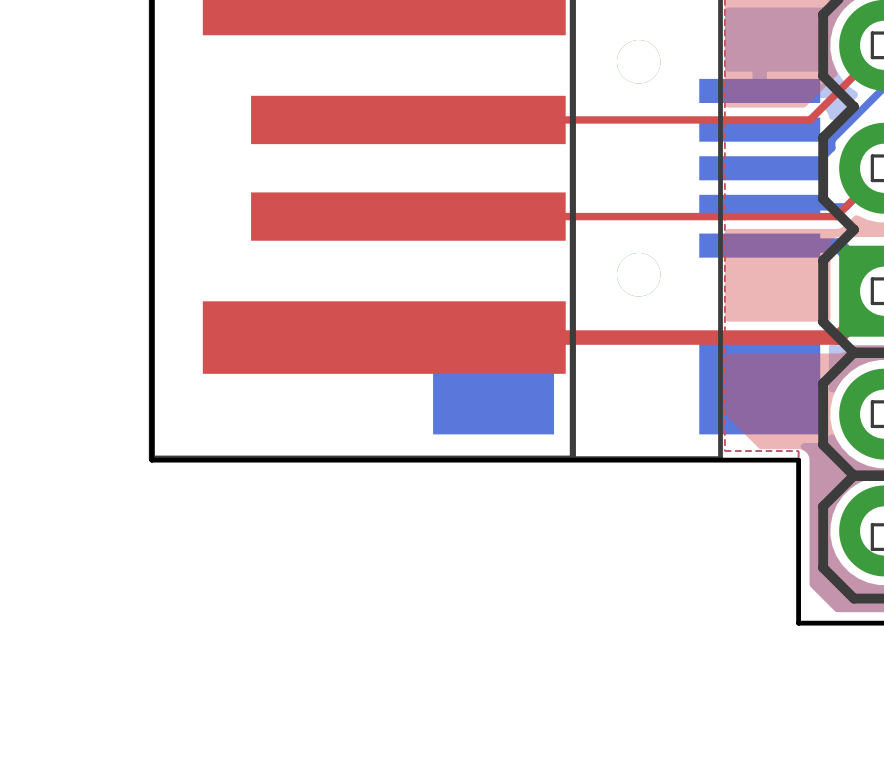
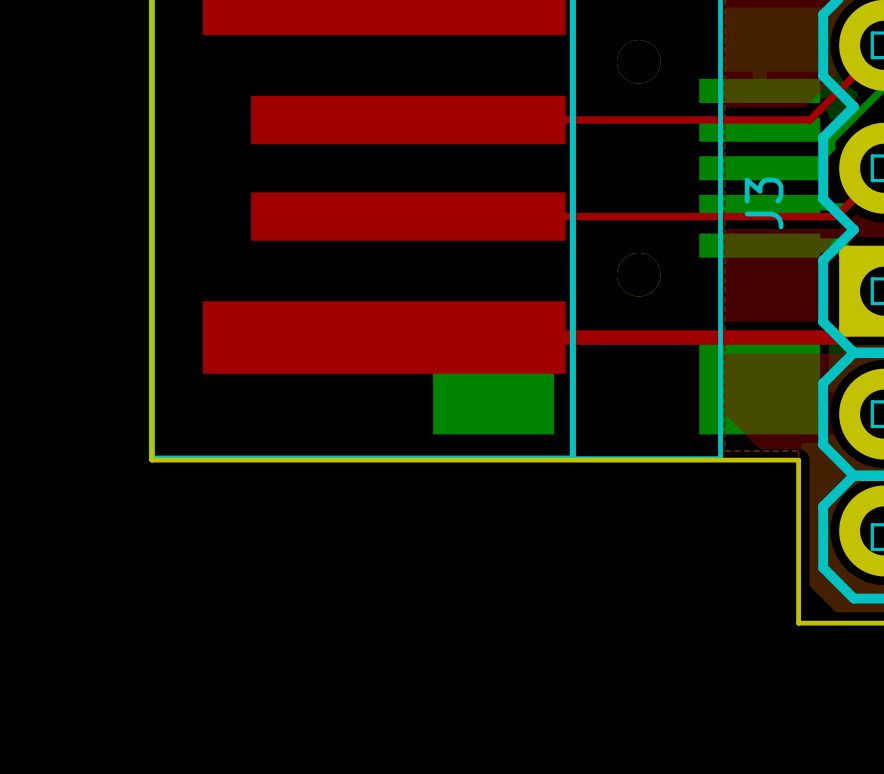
J3 name: none -> J3 (764, 203)

